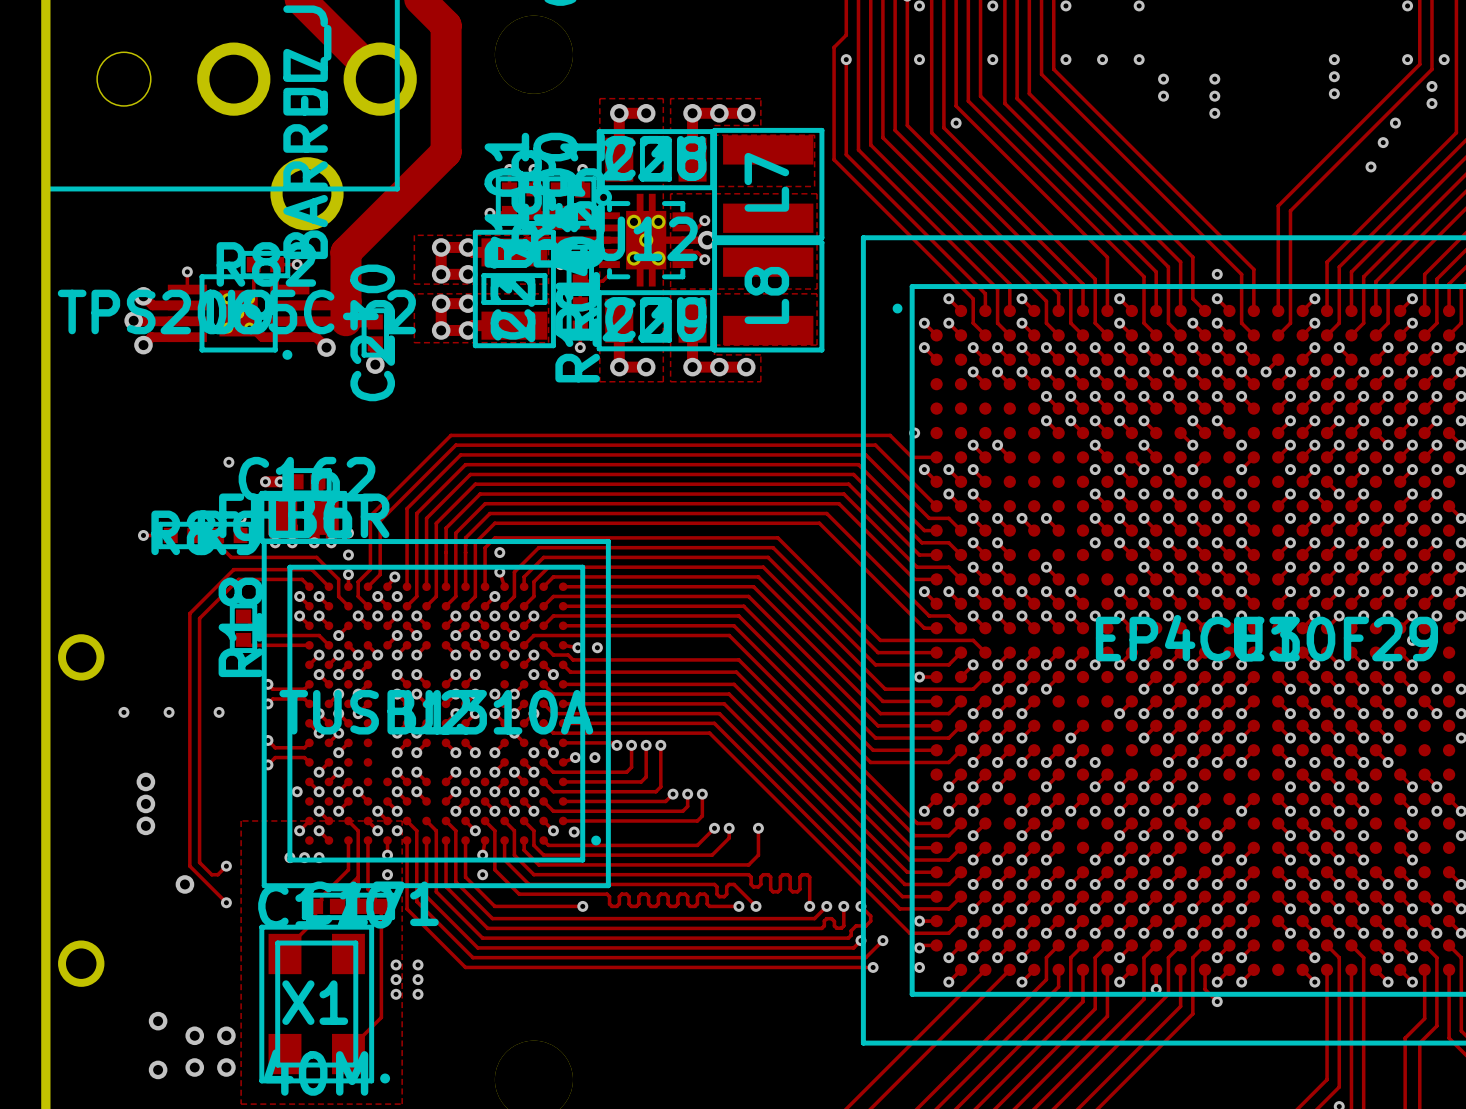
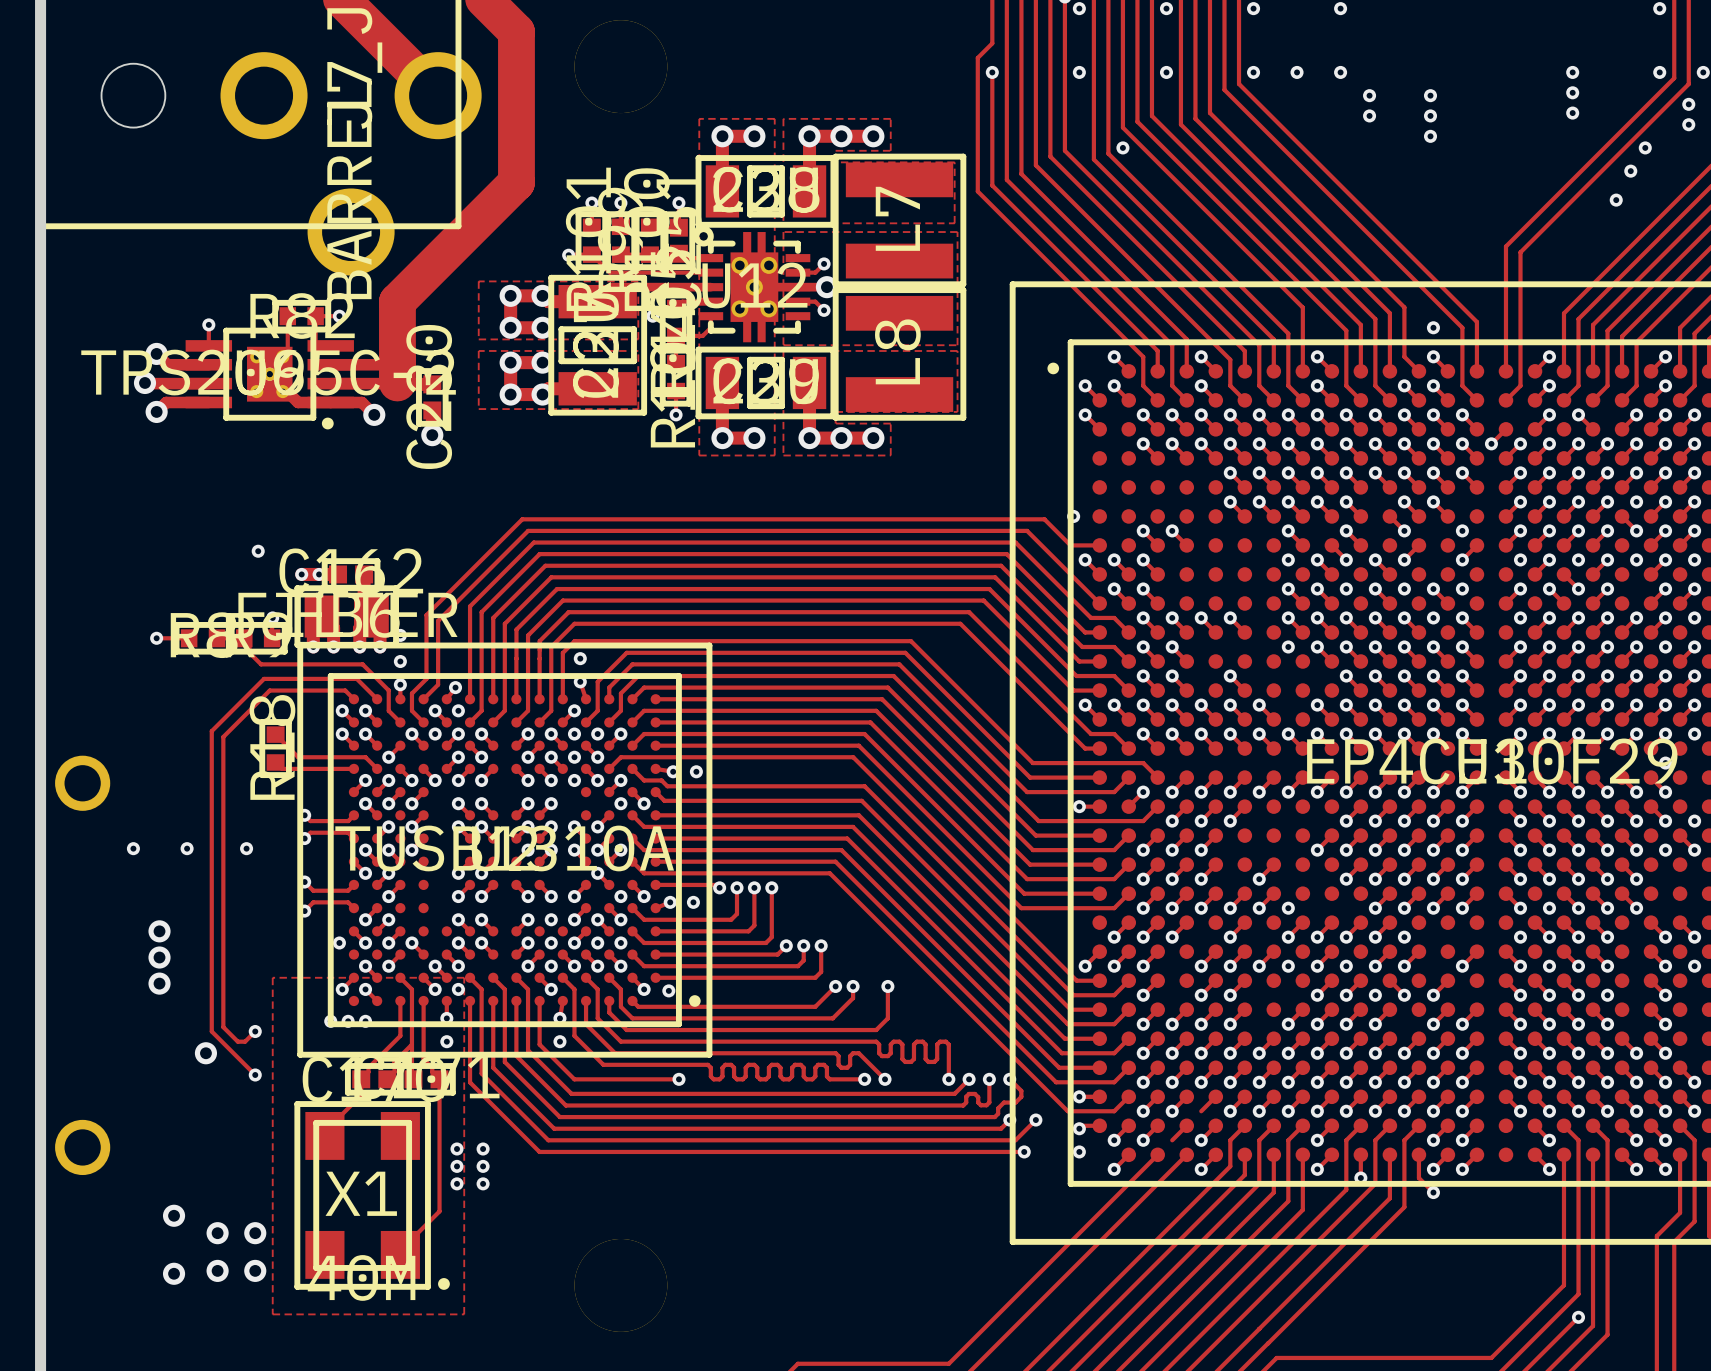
via: (1022, 933) -> none
via: (997, 957) -> none

